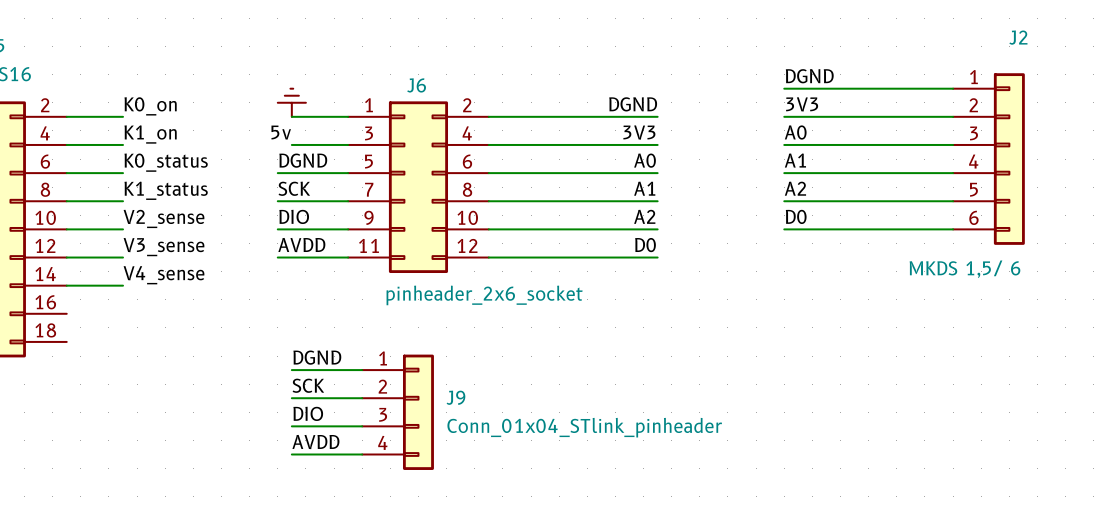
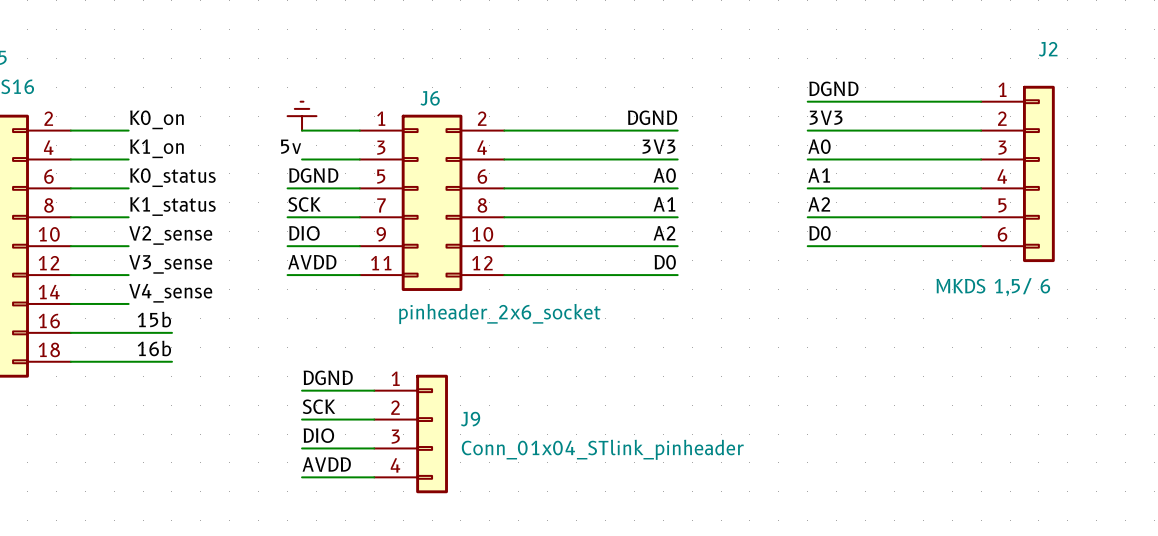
label: none -> 15b (154, 319)
wire: none -> (70, 332) (171, 332)
label: none -> 16b (154, 348)
wire: none -> (70, 361) (171, 361)

